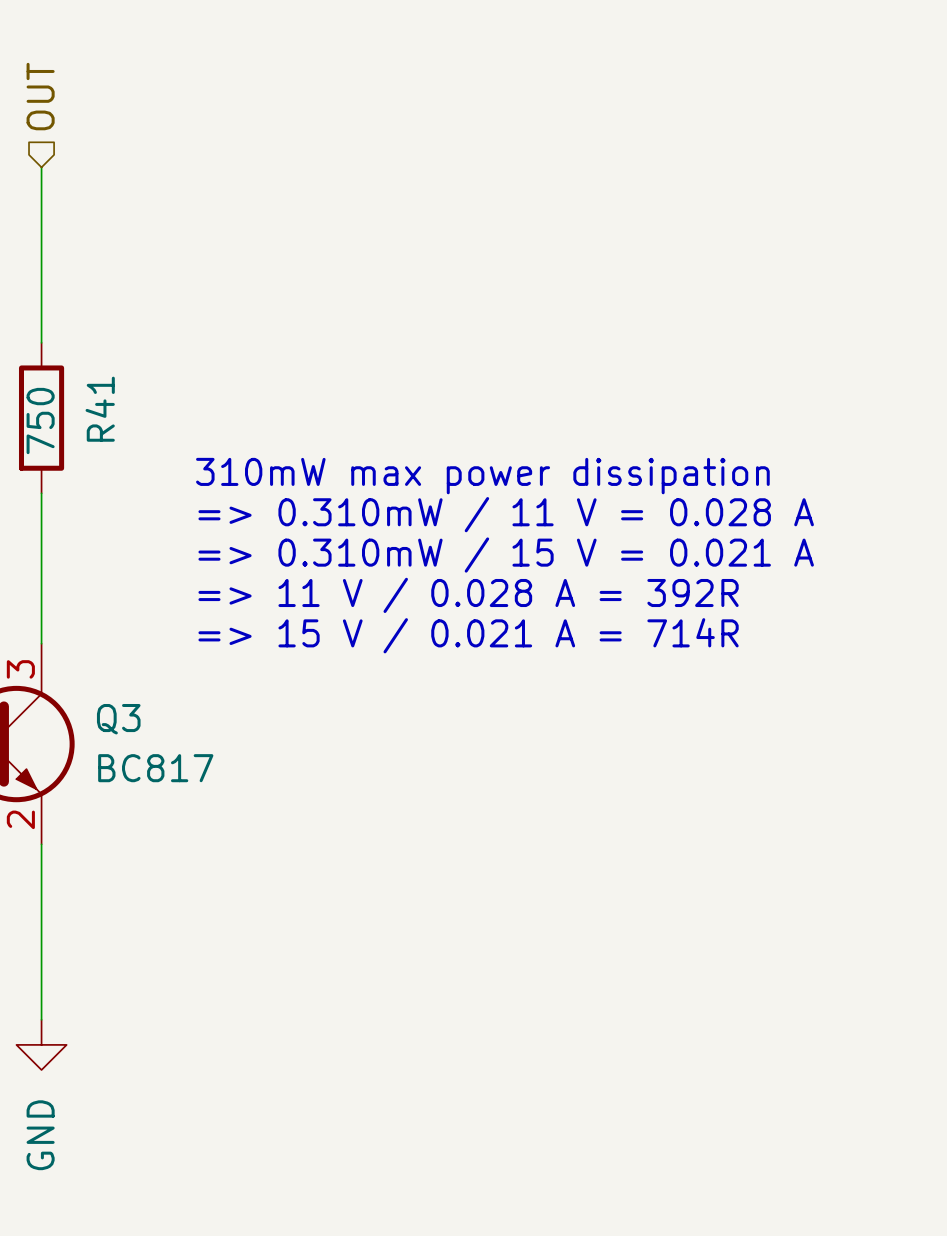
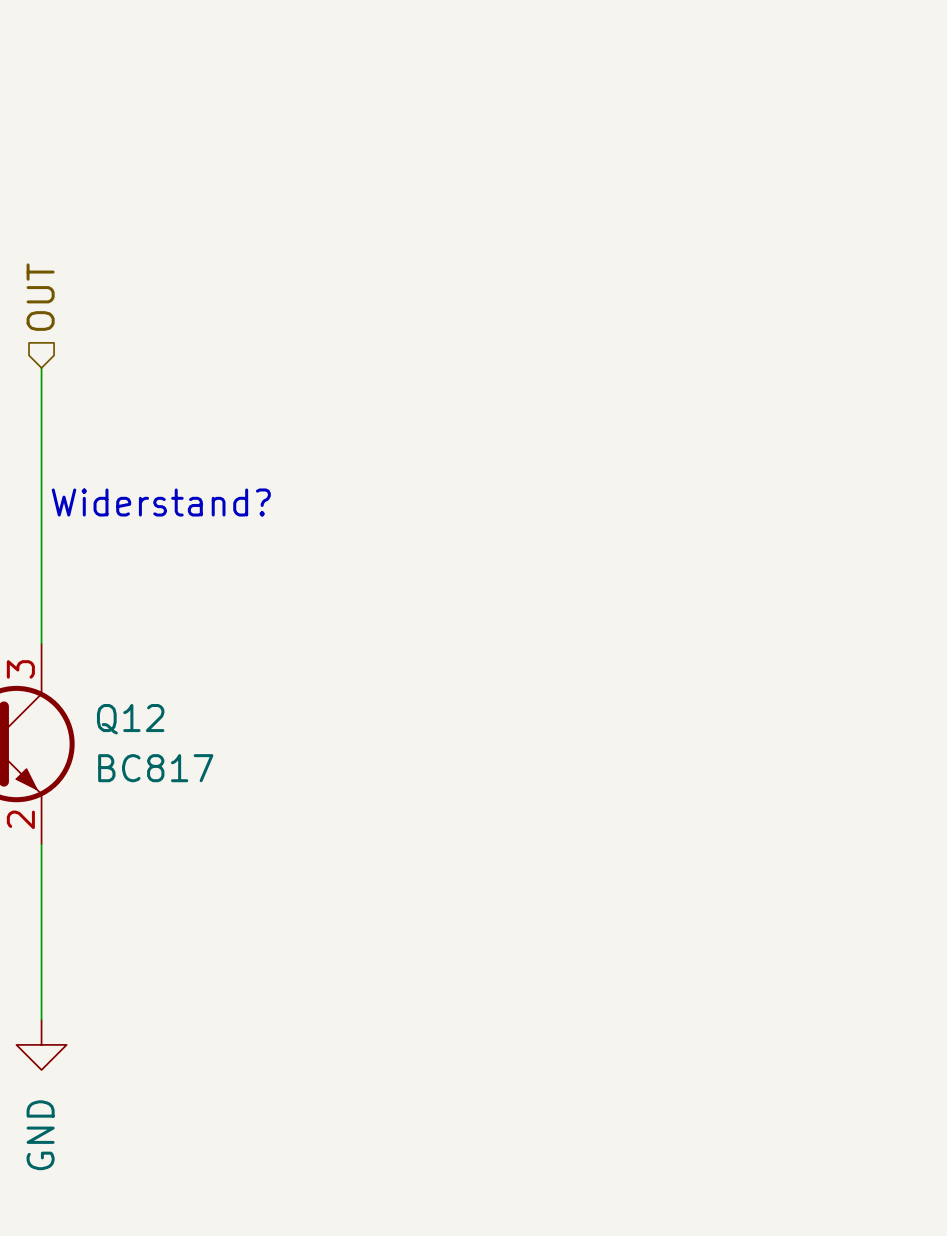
hierarchical label position: OUT (40, 96) -> OUT (40, 297)
wire: (41, 167) (41, 342) -> none
wire: none -> (41, 367) (41, 493)
R41: 750 (41, 418) -> none
text: 310mW max power dissipation (482, 476) -> none
text: none -> Widerstand? (161, 502)
text: => 0.310mW / 11 V = 0.028 A (506, 514) -> none
text: => 0.310mW / 15 V = 0.021 A (506, 555) -> none
text: => 11 V / 0.028 A = 392R (468, 595) -> none
text: => 15 V / 0.021 A = 714R (468, 635) -> none
Q3 name: Q3 (118, 719) -> Q12 (130, 719)

